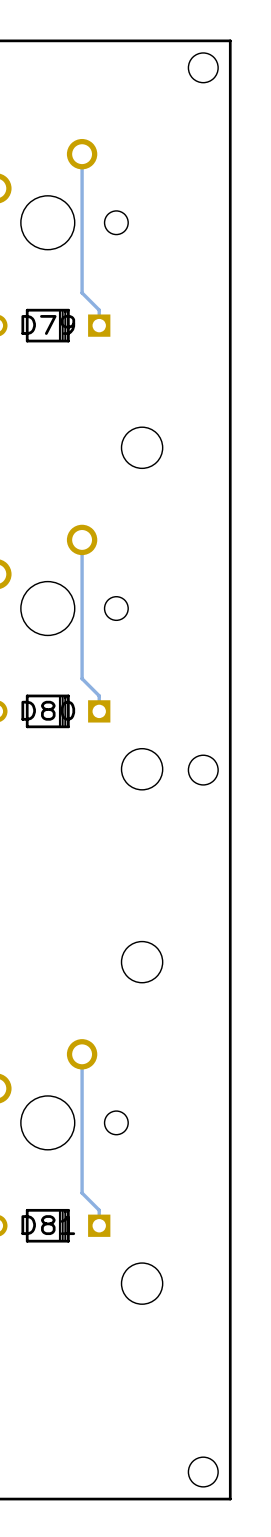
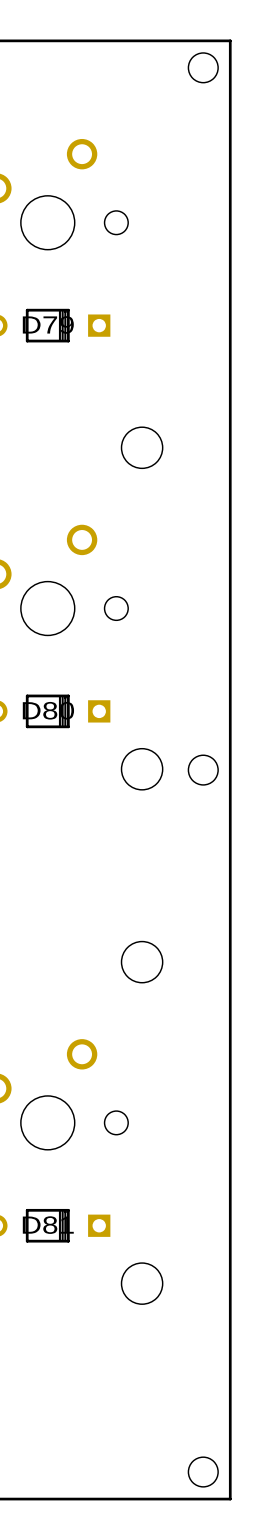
bottom track: (82, 154) (82, 292) (99, 310) (99, 325) -> none
bottom track: (82, 539) (82, 678) (99, 695) (99, 711) -> none
bottom track: (82, 1054) (82, 1193) (99, 1210) (99, 1225) -> none

